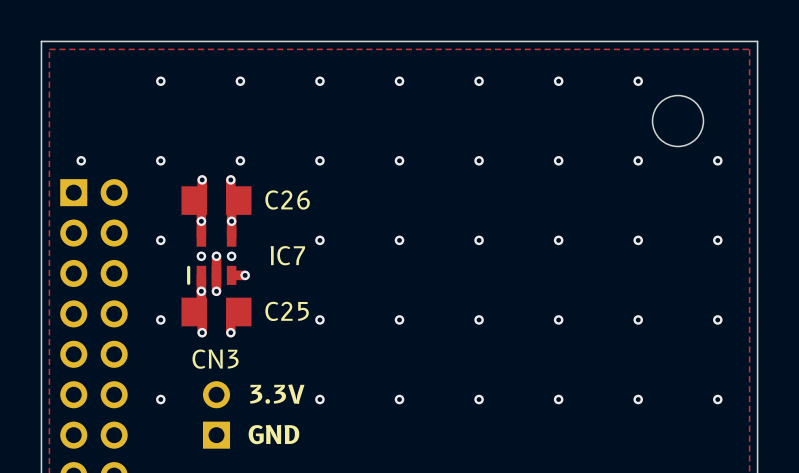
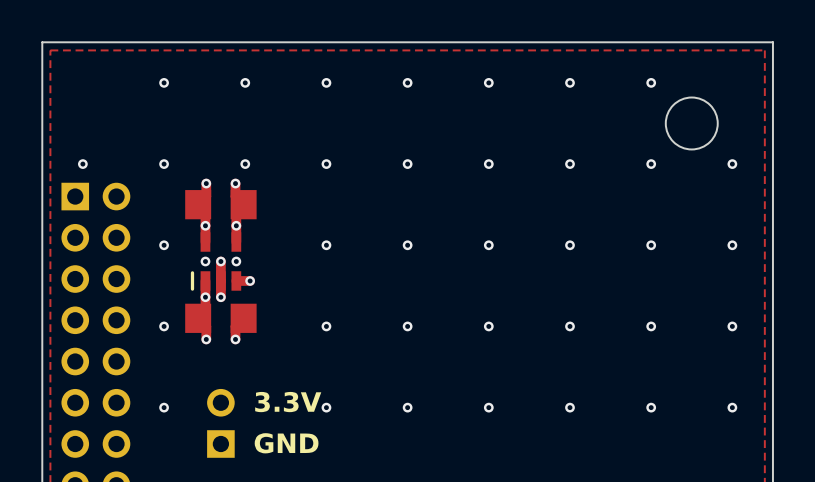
C26 name: C26 (287, 200) -> none
IC7 name: IC7 (287, 255) -> none
C25 name: C25 (287, 311) -> none
CN3 name: CN3 (215, 359) -> none

